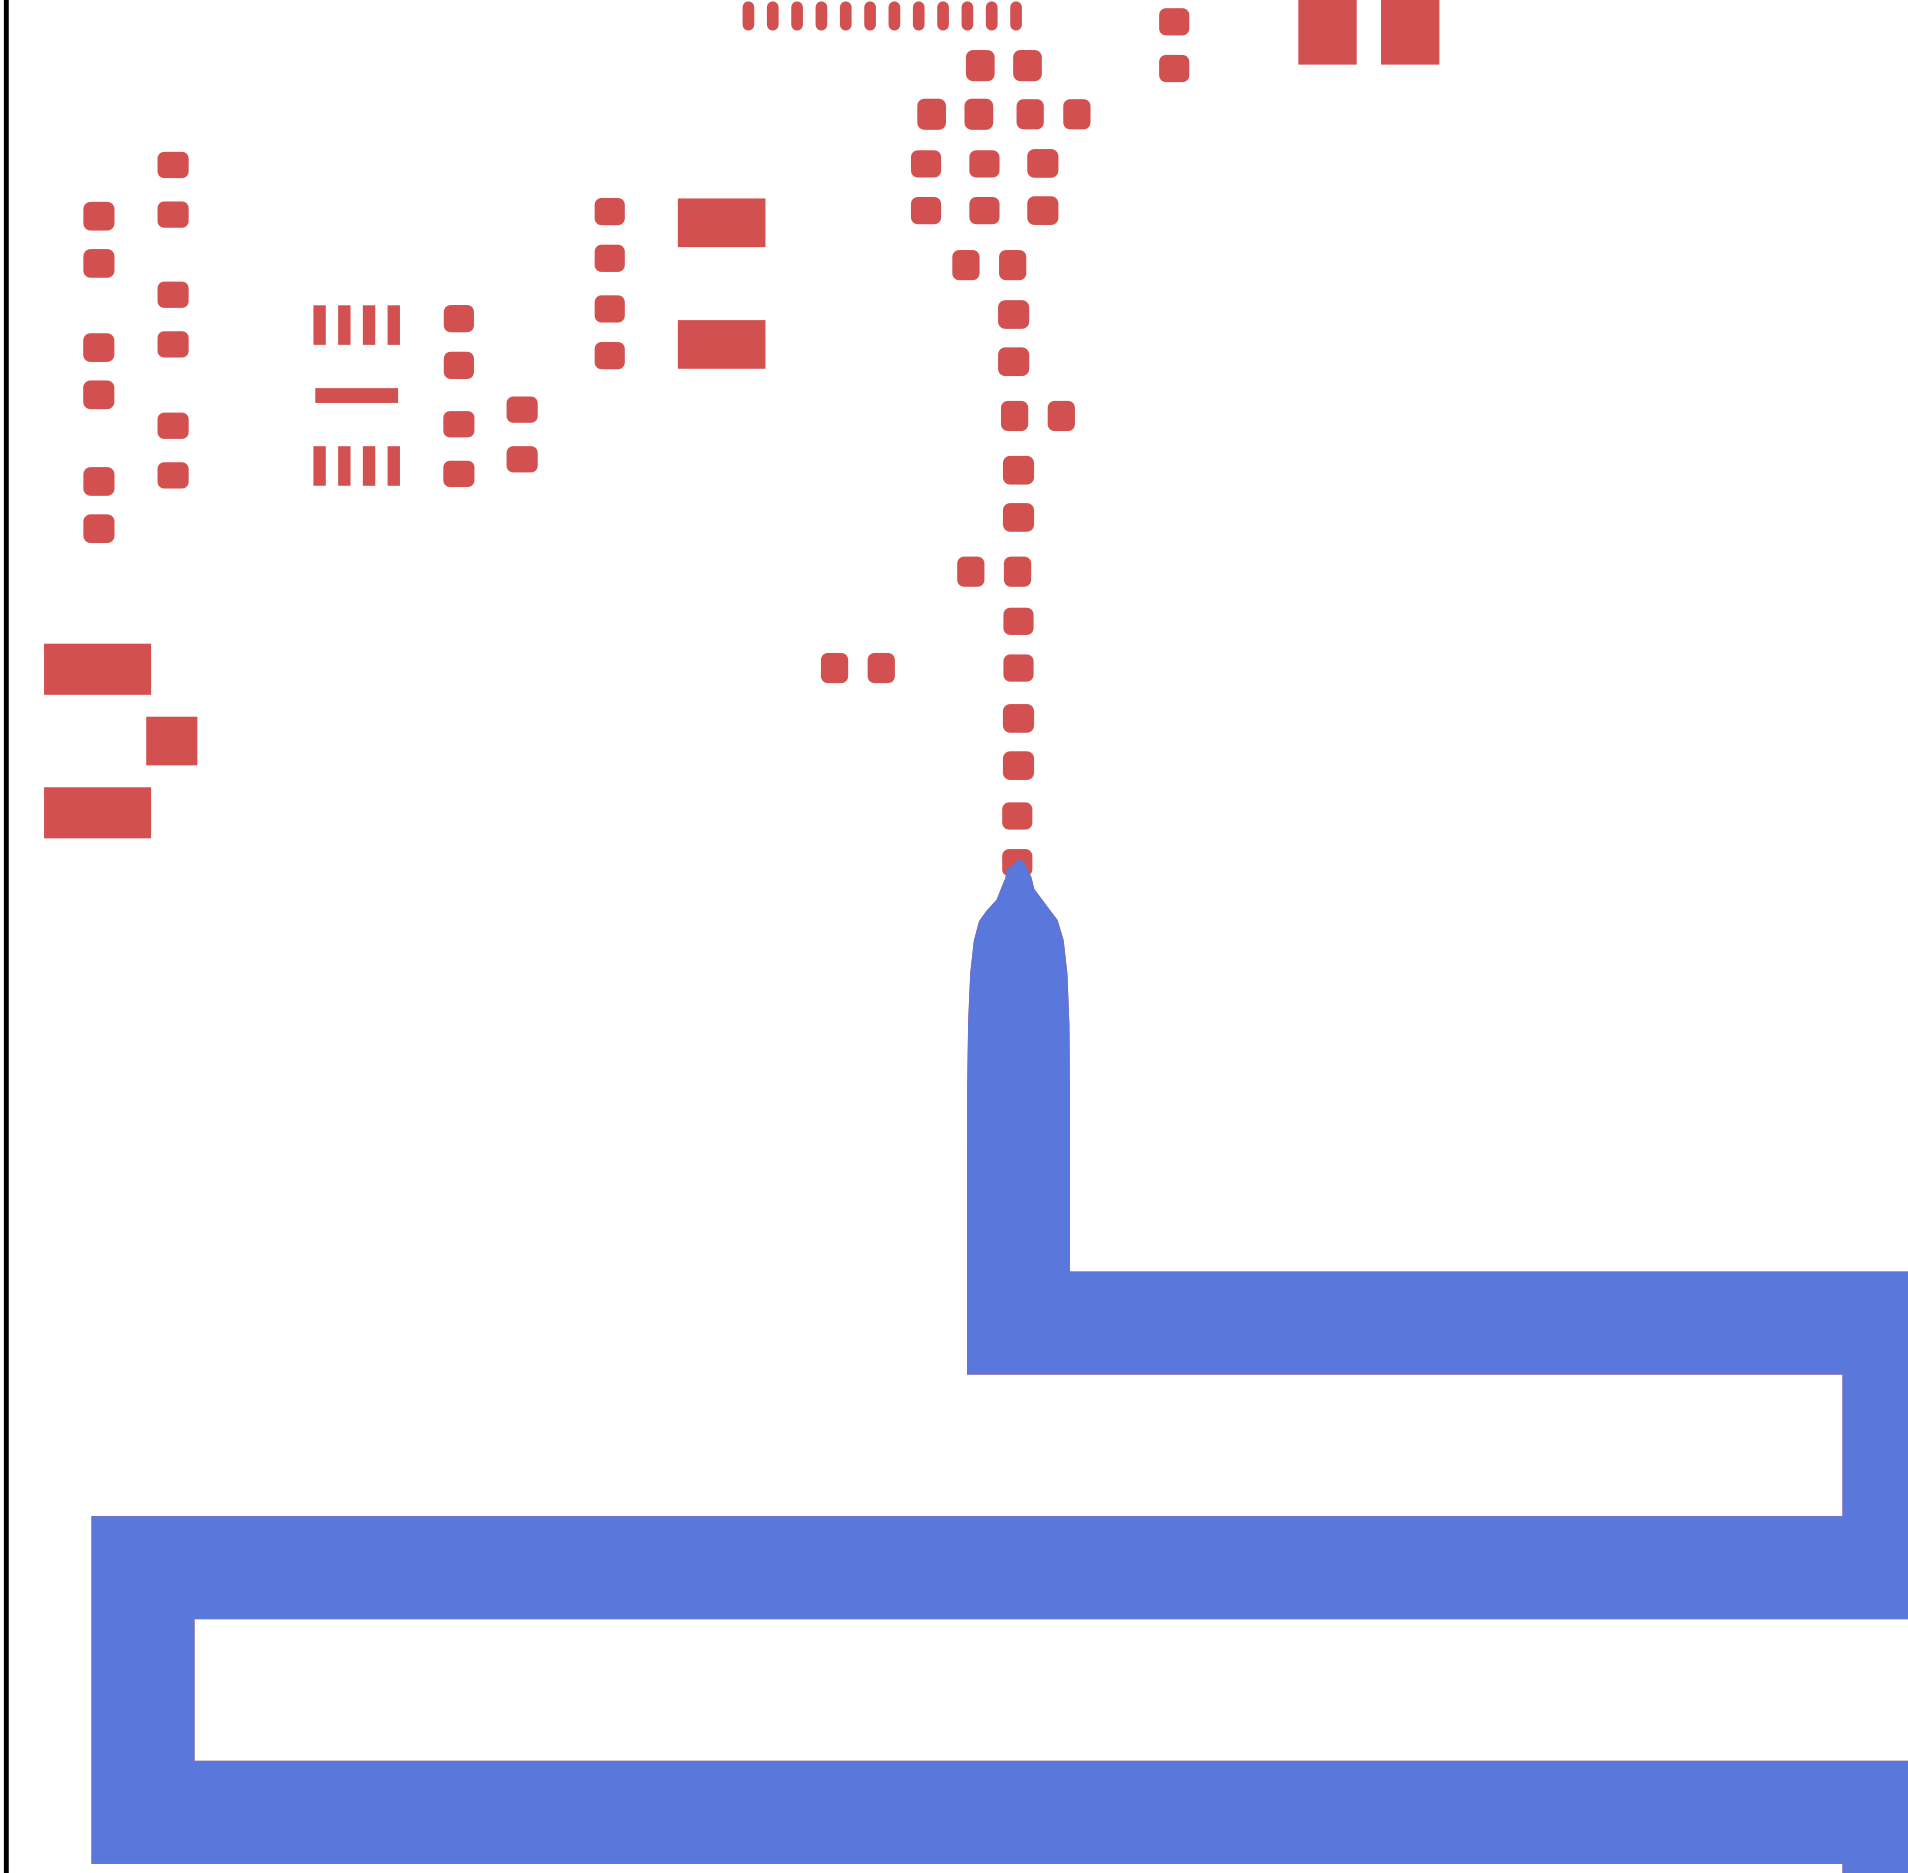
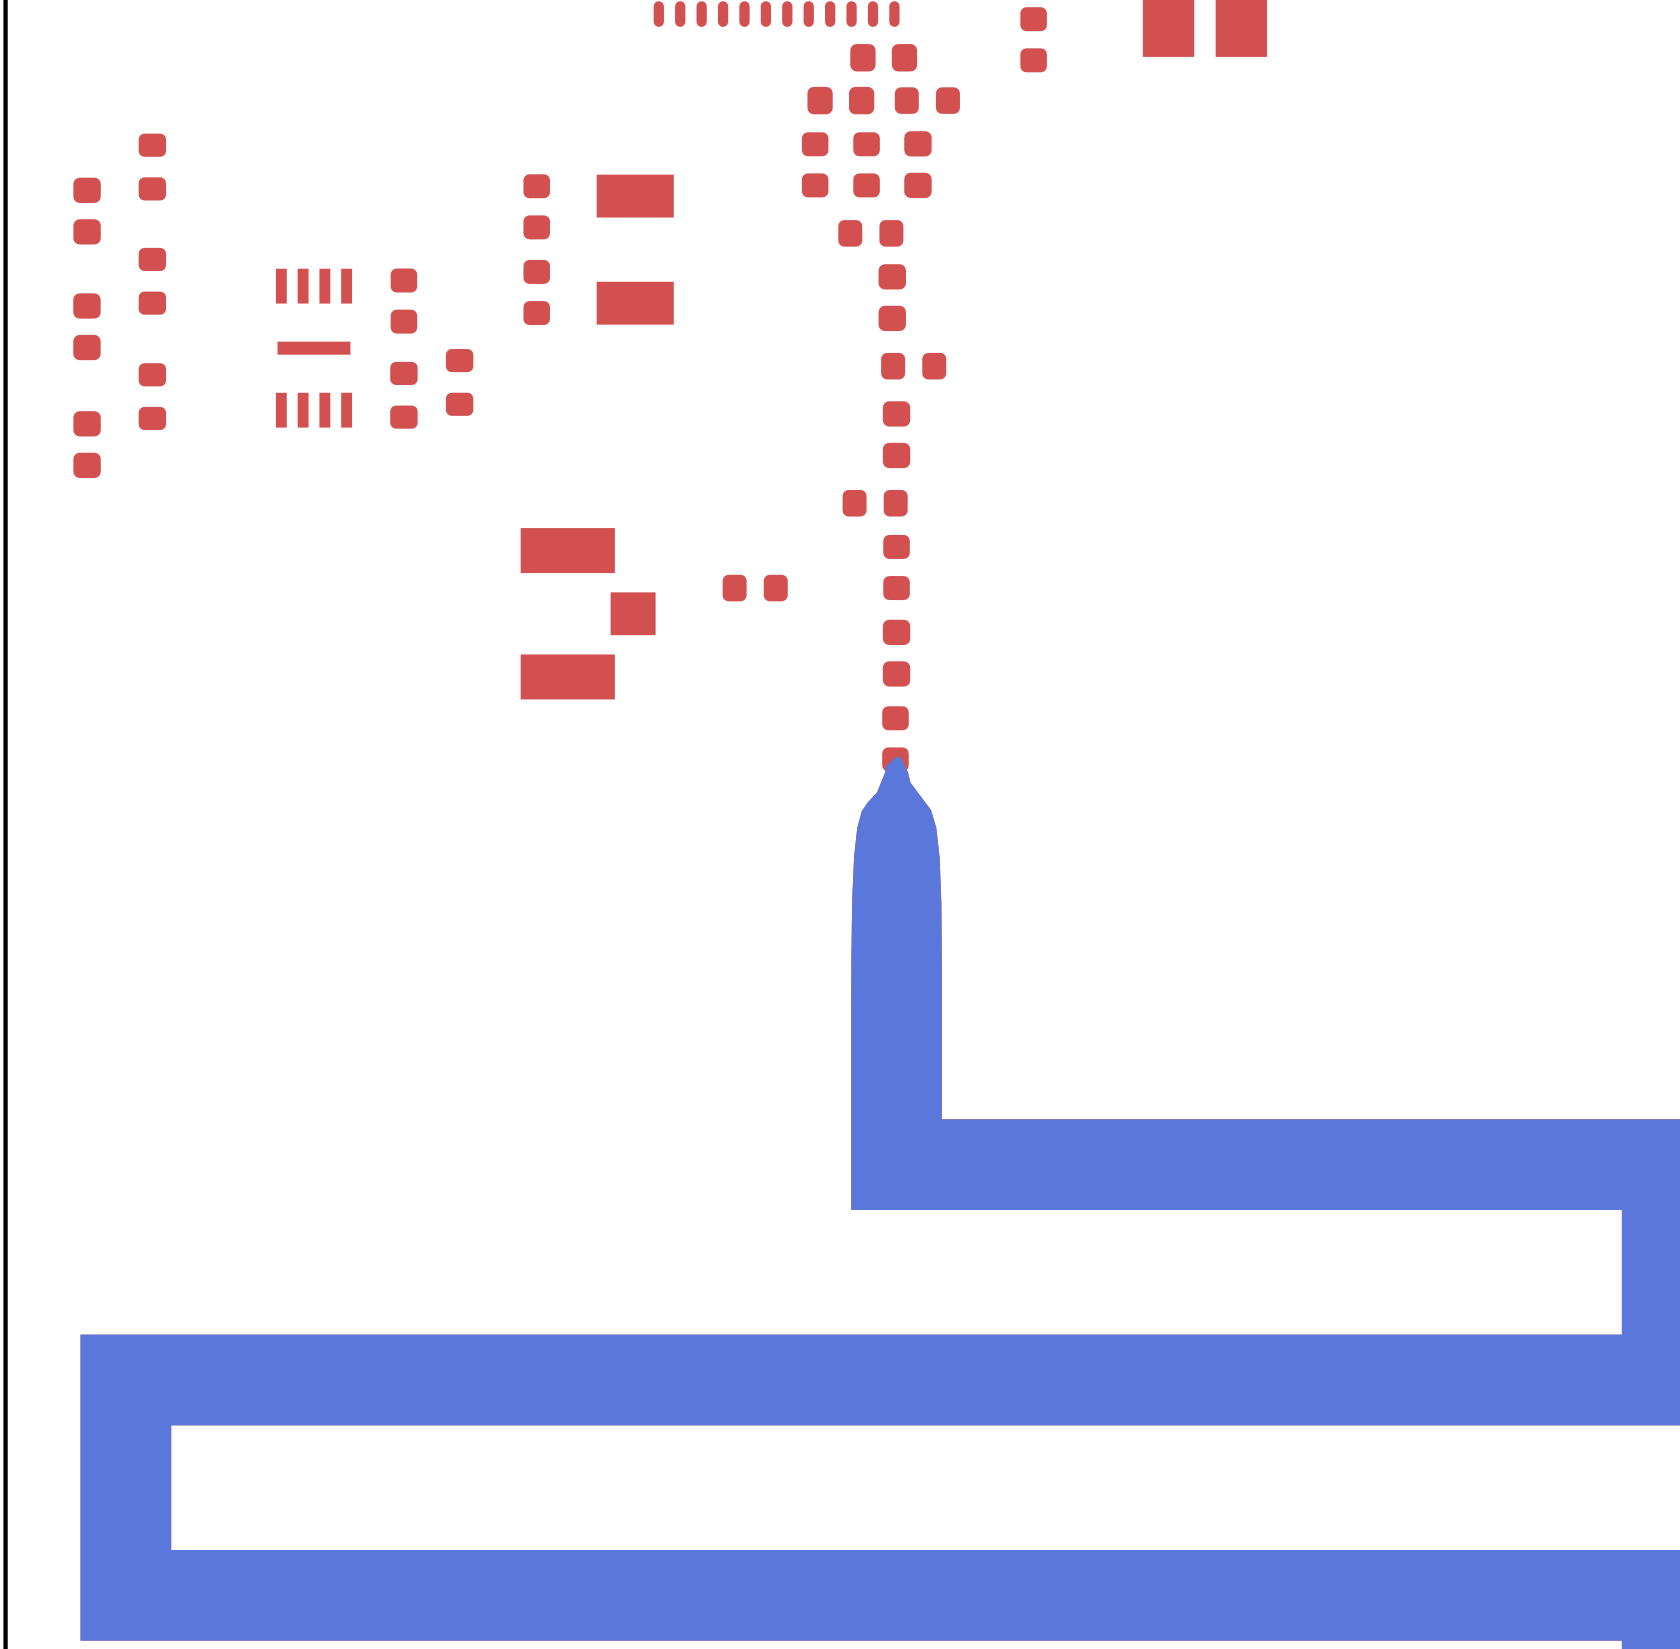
part position: (120, 741) -> (588, 613)

